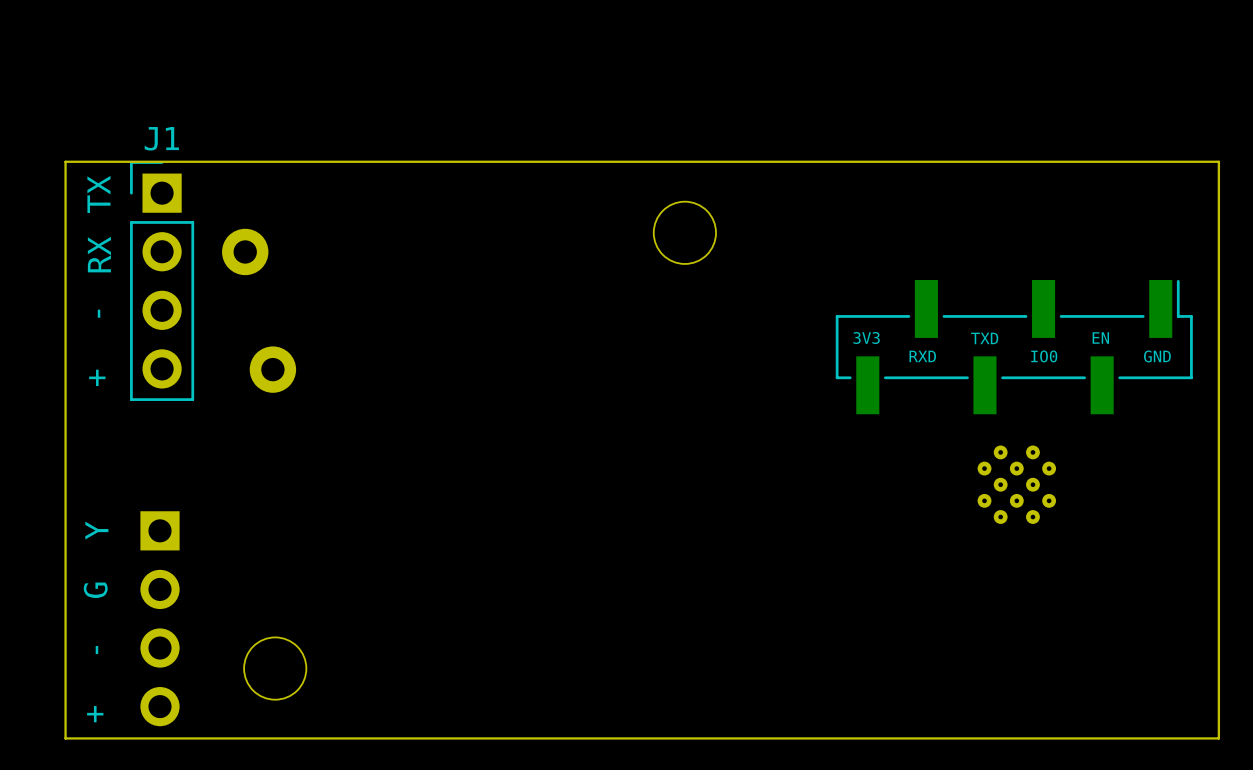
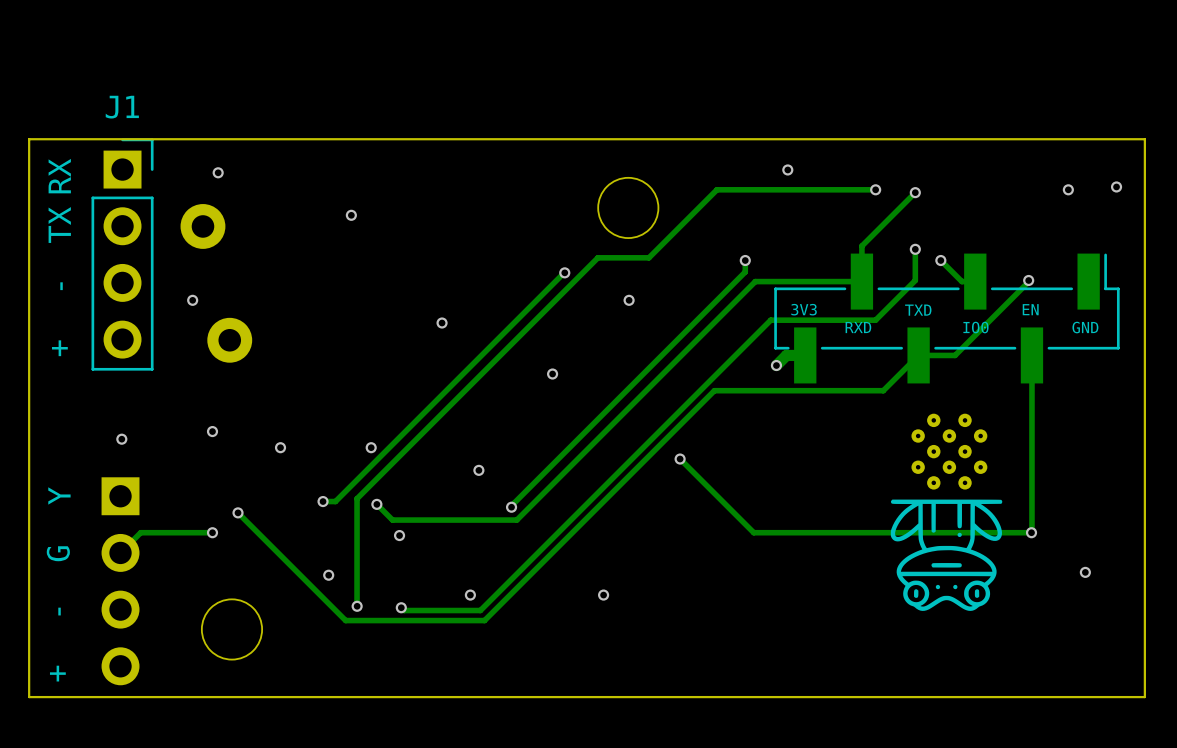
J1 footprint: [130, 161, 195, 401] -> [91, 138, 154, 371]
via: none -> (787, 169)
text position: TX (98, 194) -> TX (59, 225)
via: none -> (218, 172)
via: none -> (1116, 186)
track: none -> (875, 189) (716, 189) (648, 257) (597, 257) (357, 498) (357, 606)
via: none -> (875, 189)
via: none -> (1068, 189)
track: none -> (915, 192) (861, 246) (861, 281) (755, 281) (516, 520) (392, 520) (376, 504)
via: none -> (915, 192)
via: none -> (351, 215)
text position: RX (99, 254) -> RX (59, 176)
track: none -> (915, 249) (915, 280) (875, 320) (770, 320) (480, 610) (404, 610) (401, 607)
via: none -> (915, 249)
track: none -> (745, 260) (745, 271) (511, 507)
via: none -> (745, 260)
track: none -> (940, 260) (961, 281) (975, 281)
via: none -> (940, 260)
track: none -> (564, 272) (335, 501) (323, 501)
via: none -> (564, 272)
track: none -> (1028, 280) (955, 355) (918, 355) (883, 390) (714, 390) (484, 620) (345, 620) (238, 512)
via: none -> (1028, 280)
via: none -> (192, 300)
via: none -> (629, 300)
via: none -> (442, 323)
track: none -> (805, 355) (786, 355) (776, 365)
track: none -> (1031, 355) (1031, 532) (753, 532) (680, 459)
via: none -> (776, 365)
via: none -> (552, 374)
via: none -> (212, 431)
via: none -> (121, 439)
via: none -> (280, 447)
via: none -> (371, 447)
via: none -> (680, 459)
via: none -> (478, 470)
drawing: none -> [890, 499, 1003, 611]
via: none -> (323, 501)
via: none -> (376, 504)
via: none -> (511, 507)
via: none -> (238, 512)
track: none -> (212, 532) (140, 532) (120, 552)
via: none -> (212, 532)
via: none -> (1031, 532)
via: none -> (399, 535)
via: none -> (1085, 572)
via: none -> (328, 575)
via: none -> (470, 595)
via: none -> (603, 595)
via: none -> (357, 606)
via: none -> (401, 607)

